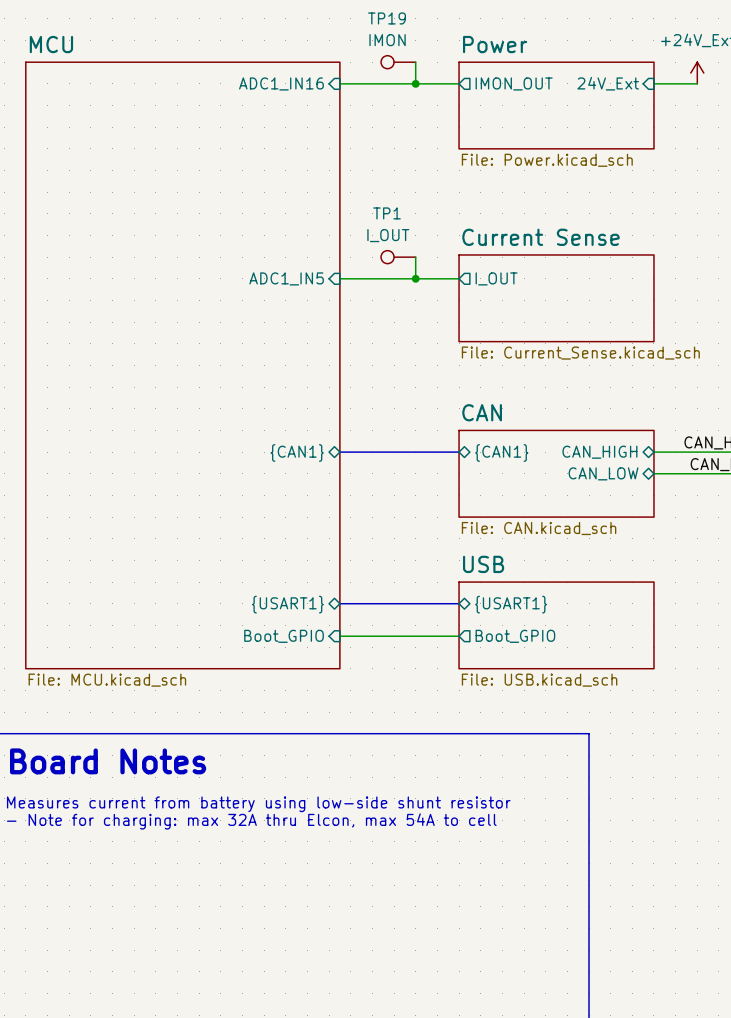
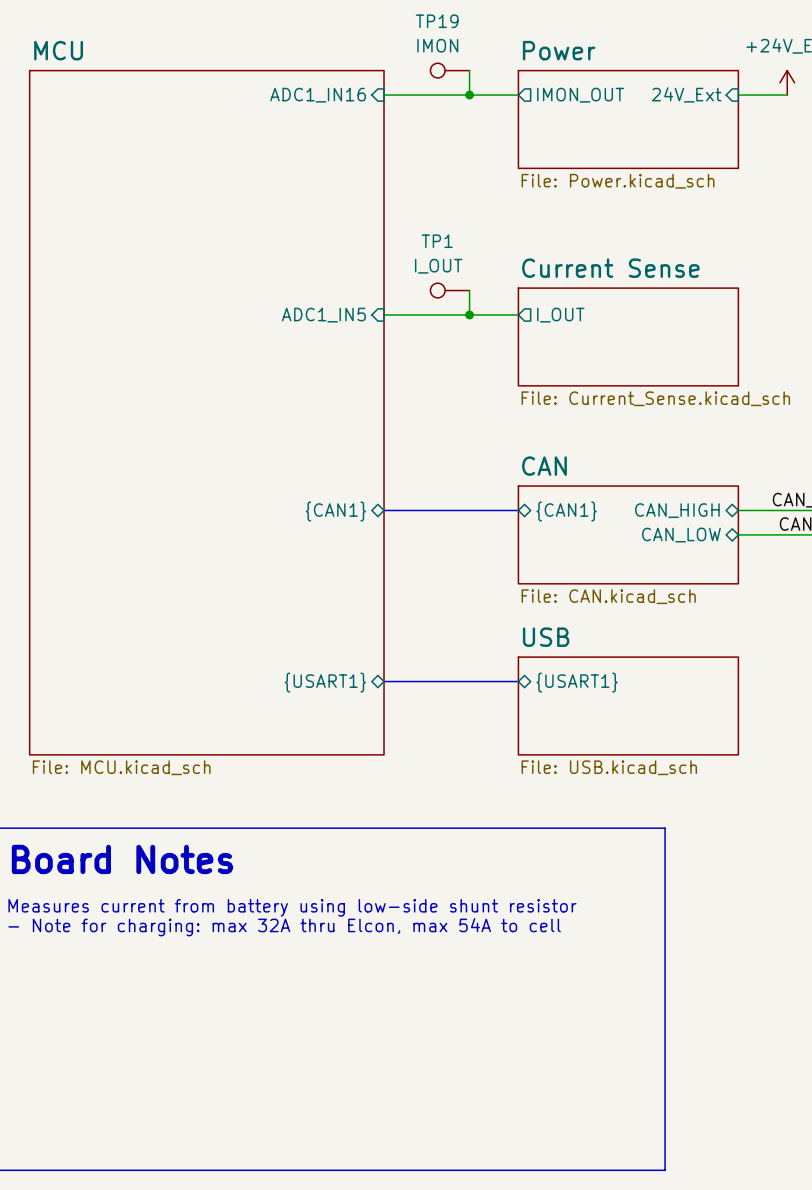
sheet pin: Boot_GPIO (284, 636) -> none
wire: (339, 636) (459, 636) -> none
sheet pin: Boot_GPIO (515, 636) -> none

